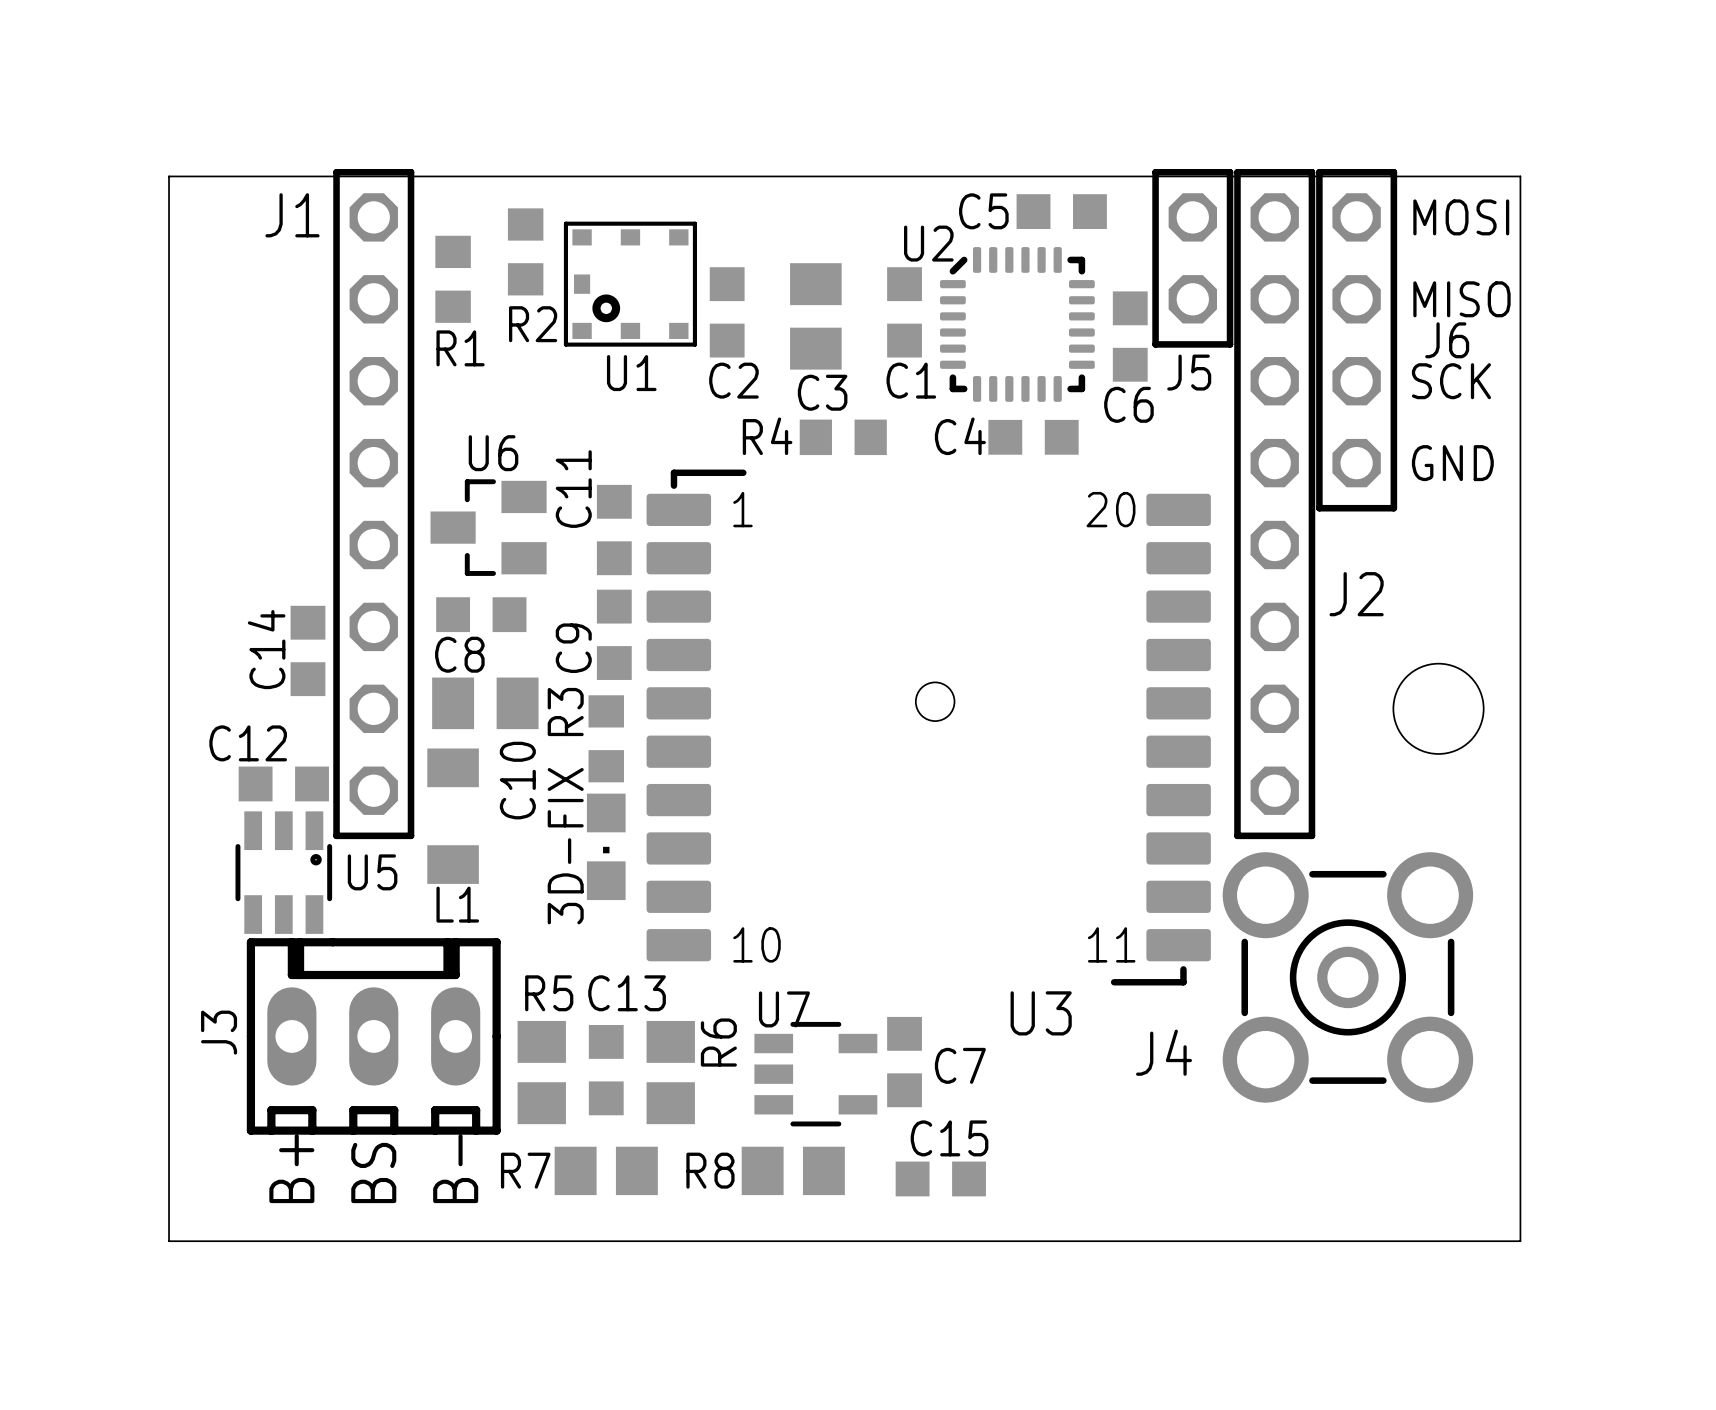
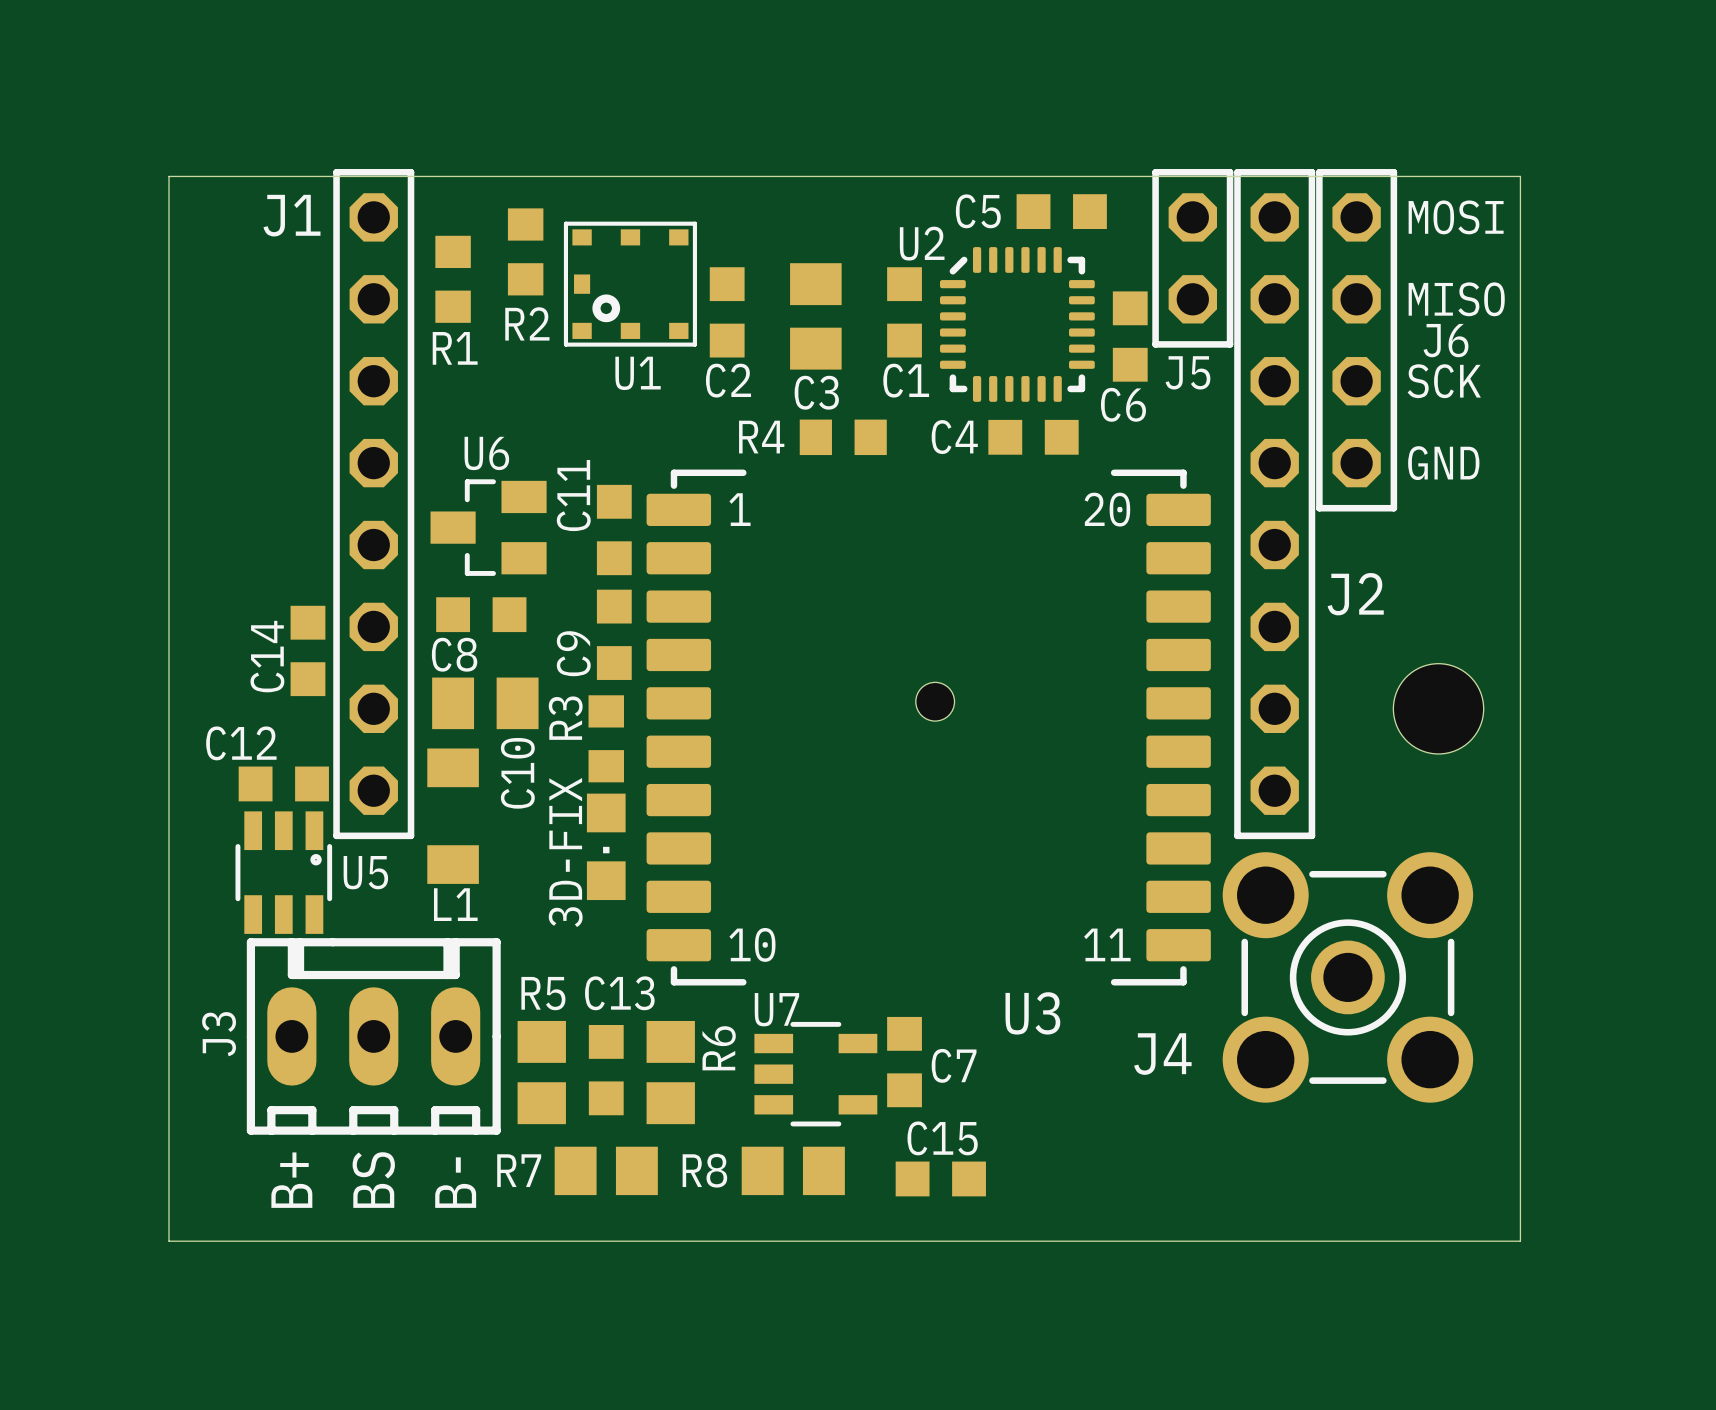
U3 footprint: [646, 469, 1211, 986] -> [646, 469, 1211, 986]
J4 footprint: [1222, 852, 1474, 1103] -> [1222, 852, 1474, 1103]

